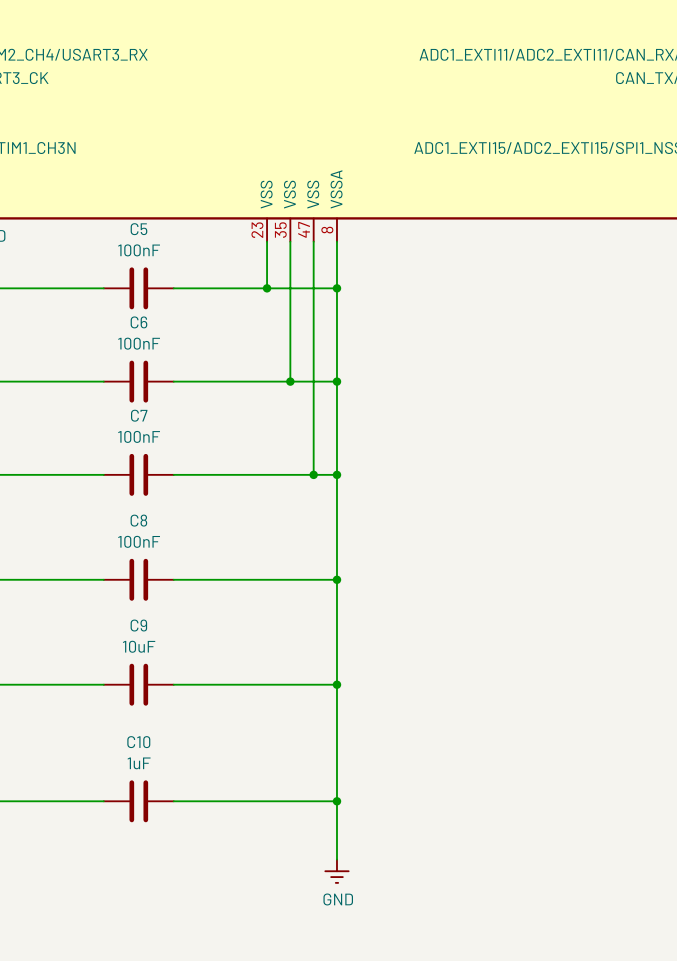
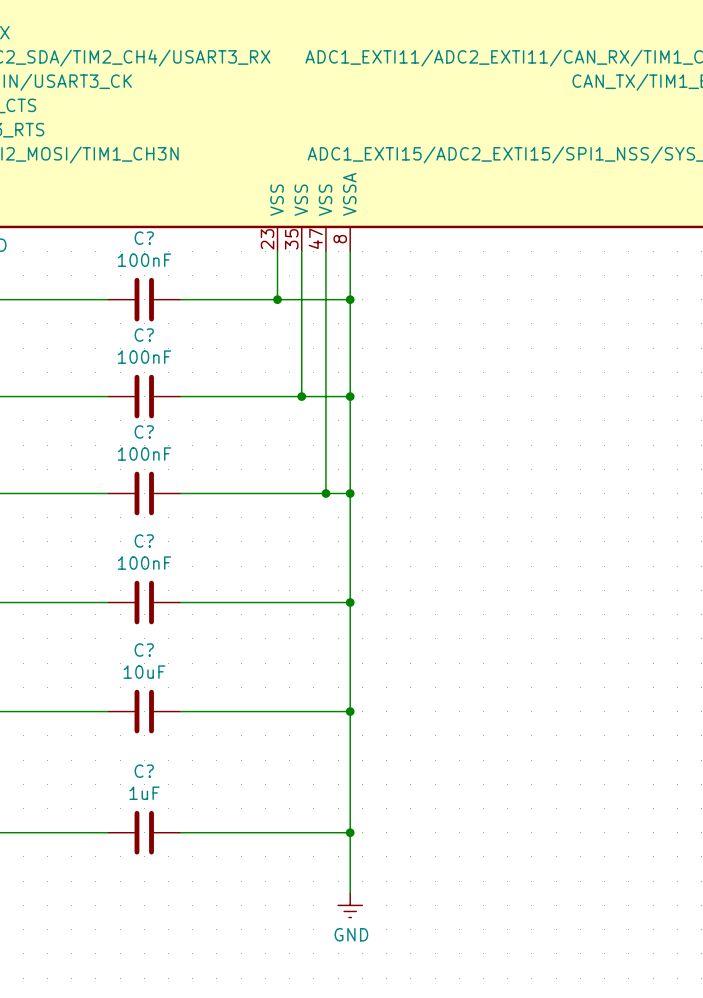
C5 name: C5 (138, 229) -> C? (144, 238)
C6 name: C6 (138, 322) -> C? (144, 335)
C7 name: C7 (139, 415) -> C? (144, 431)
C8 name: C8 (138, 520) -> C? (144, 541)
C9 name: C9 (138, 625) -> C? (144, 650)
C10 name: C10 (138, 742) -> C? (144, 771)

